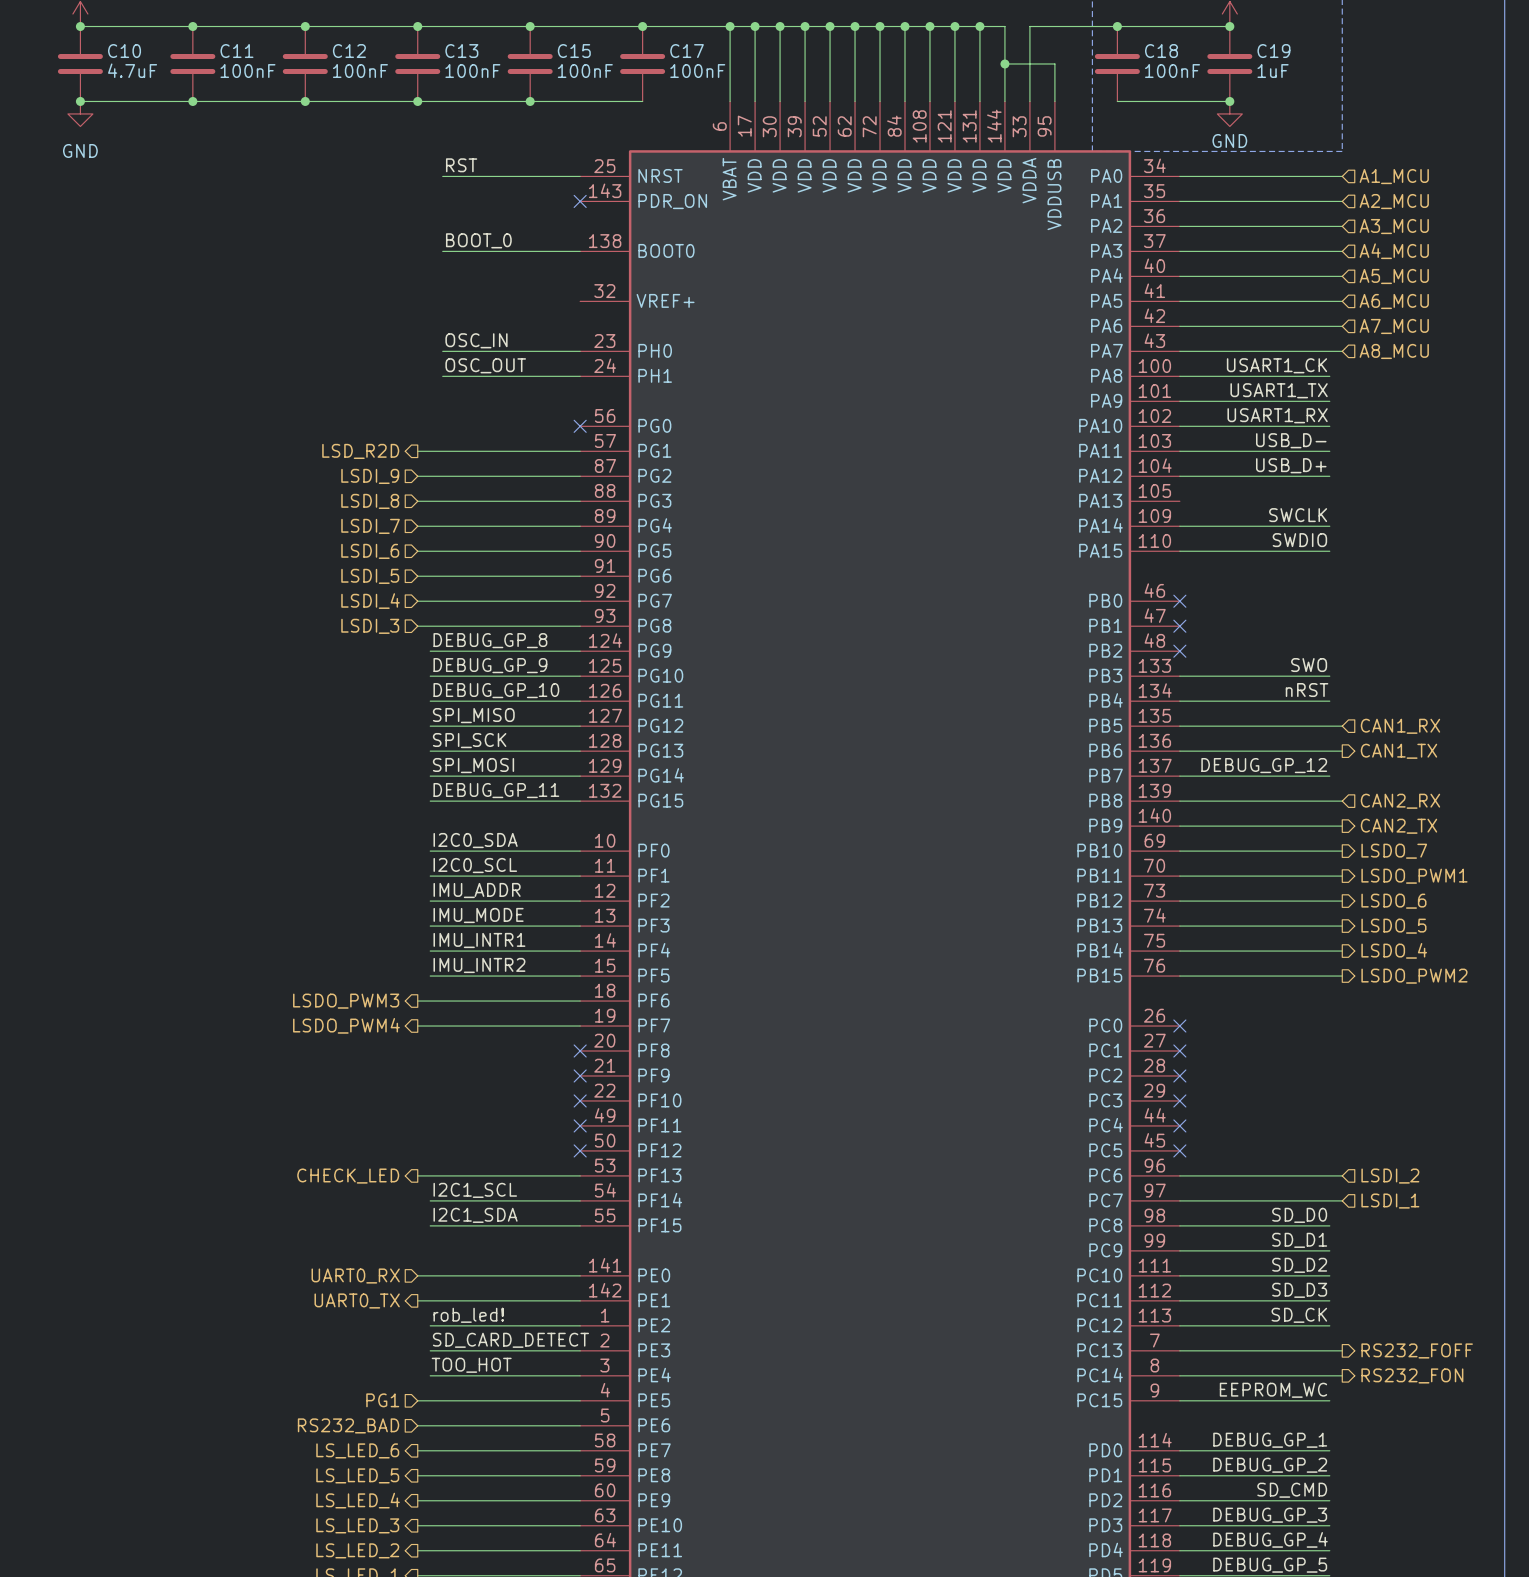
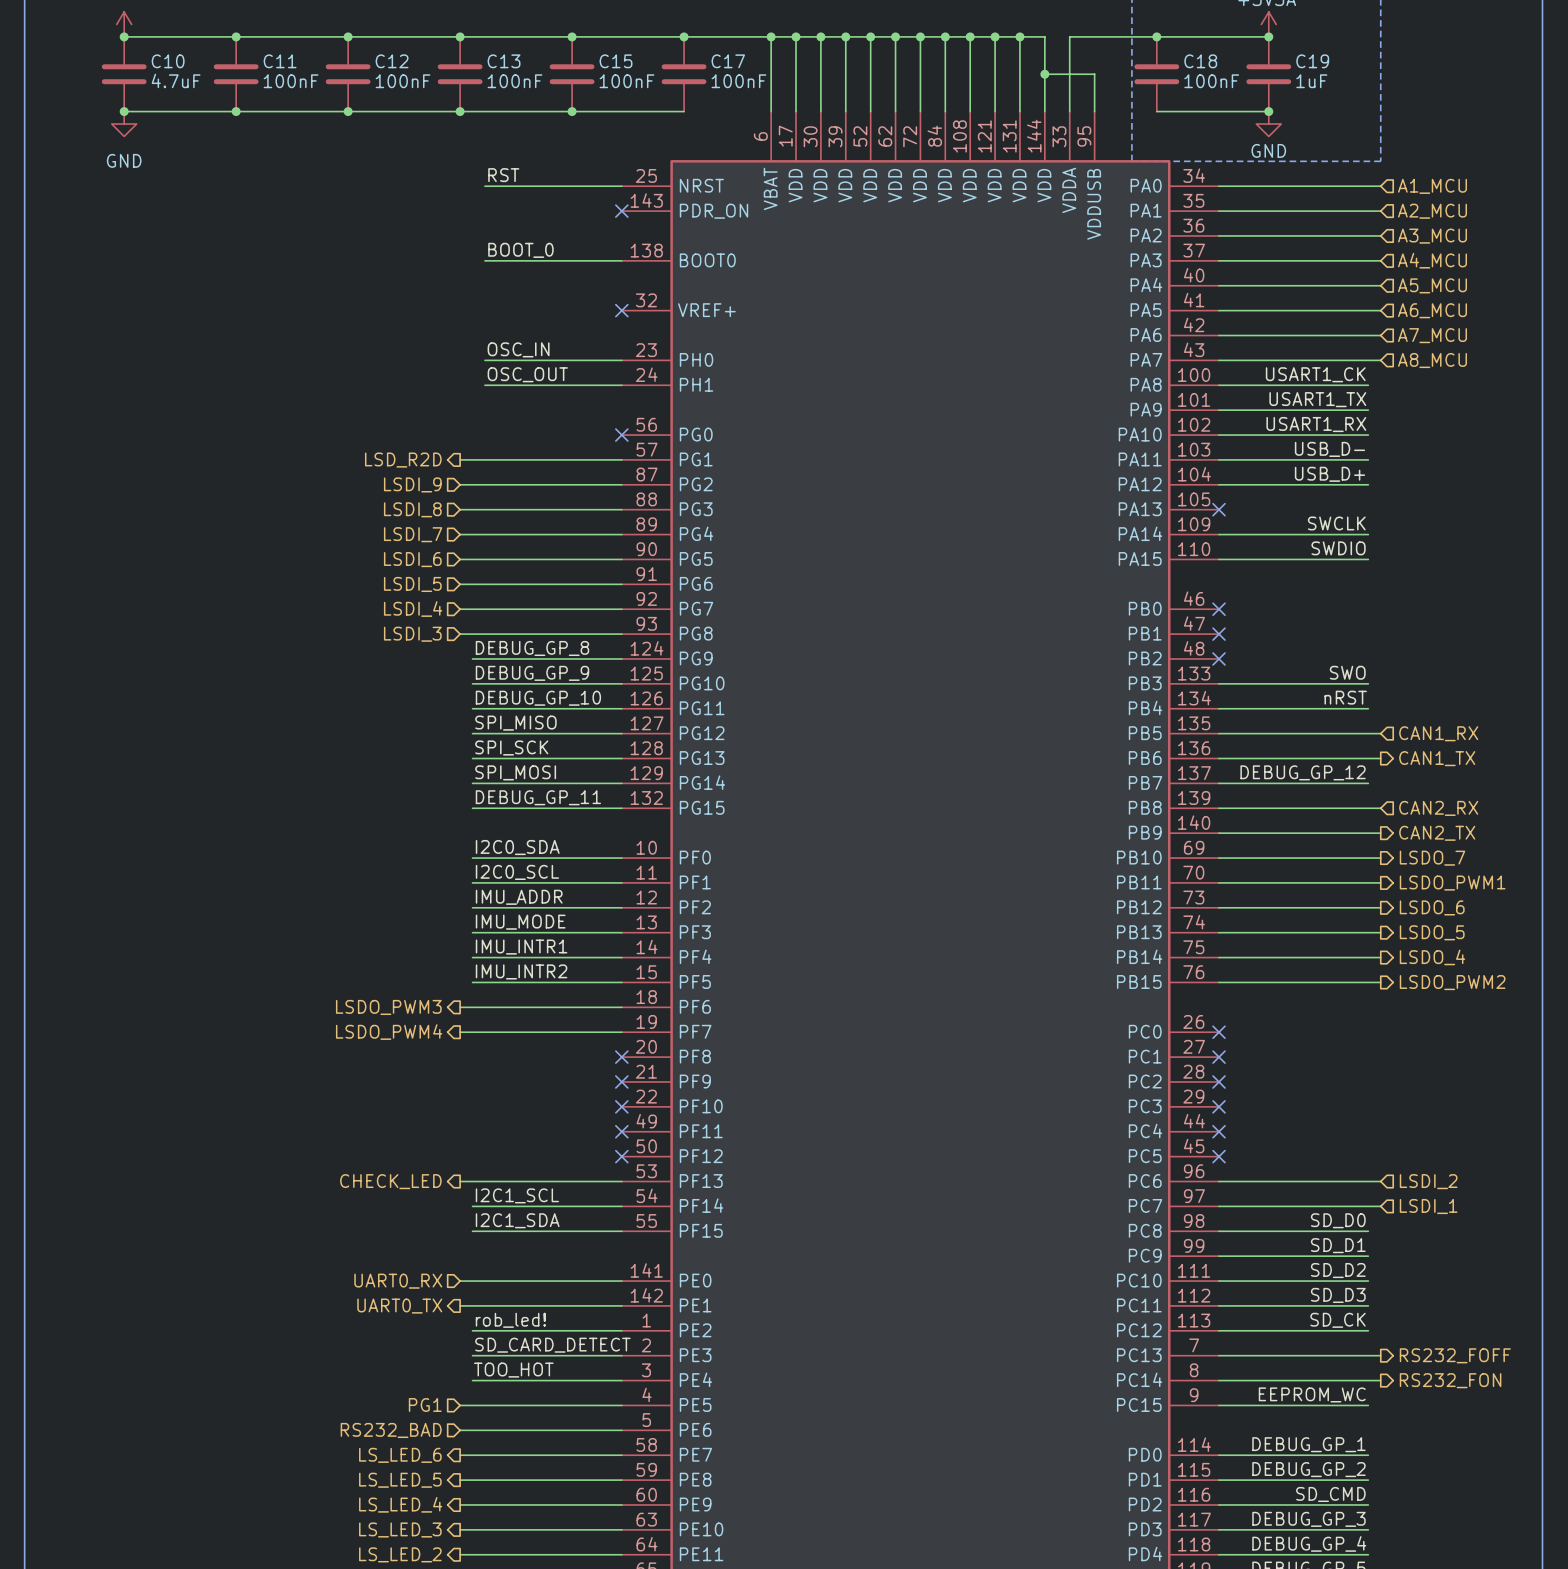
no-connect mark: none -> (621, 310)
no-connect mark: none -> (1219, 509)

